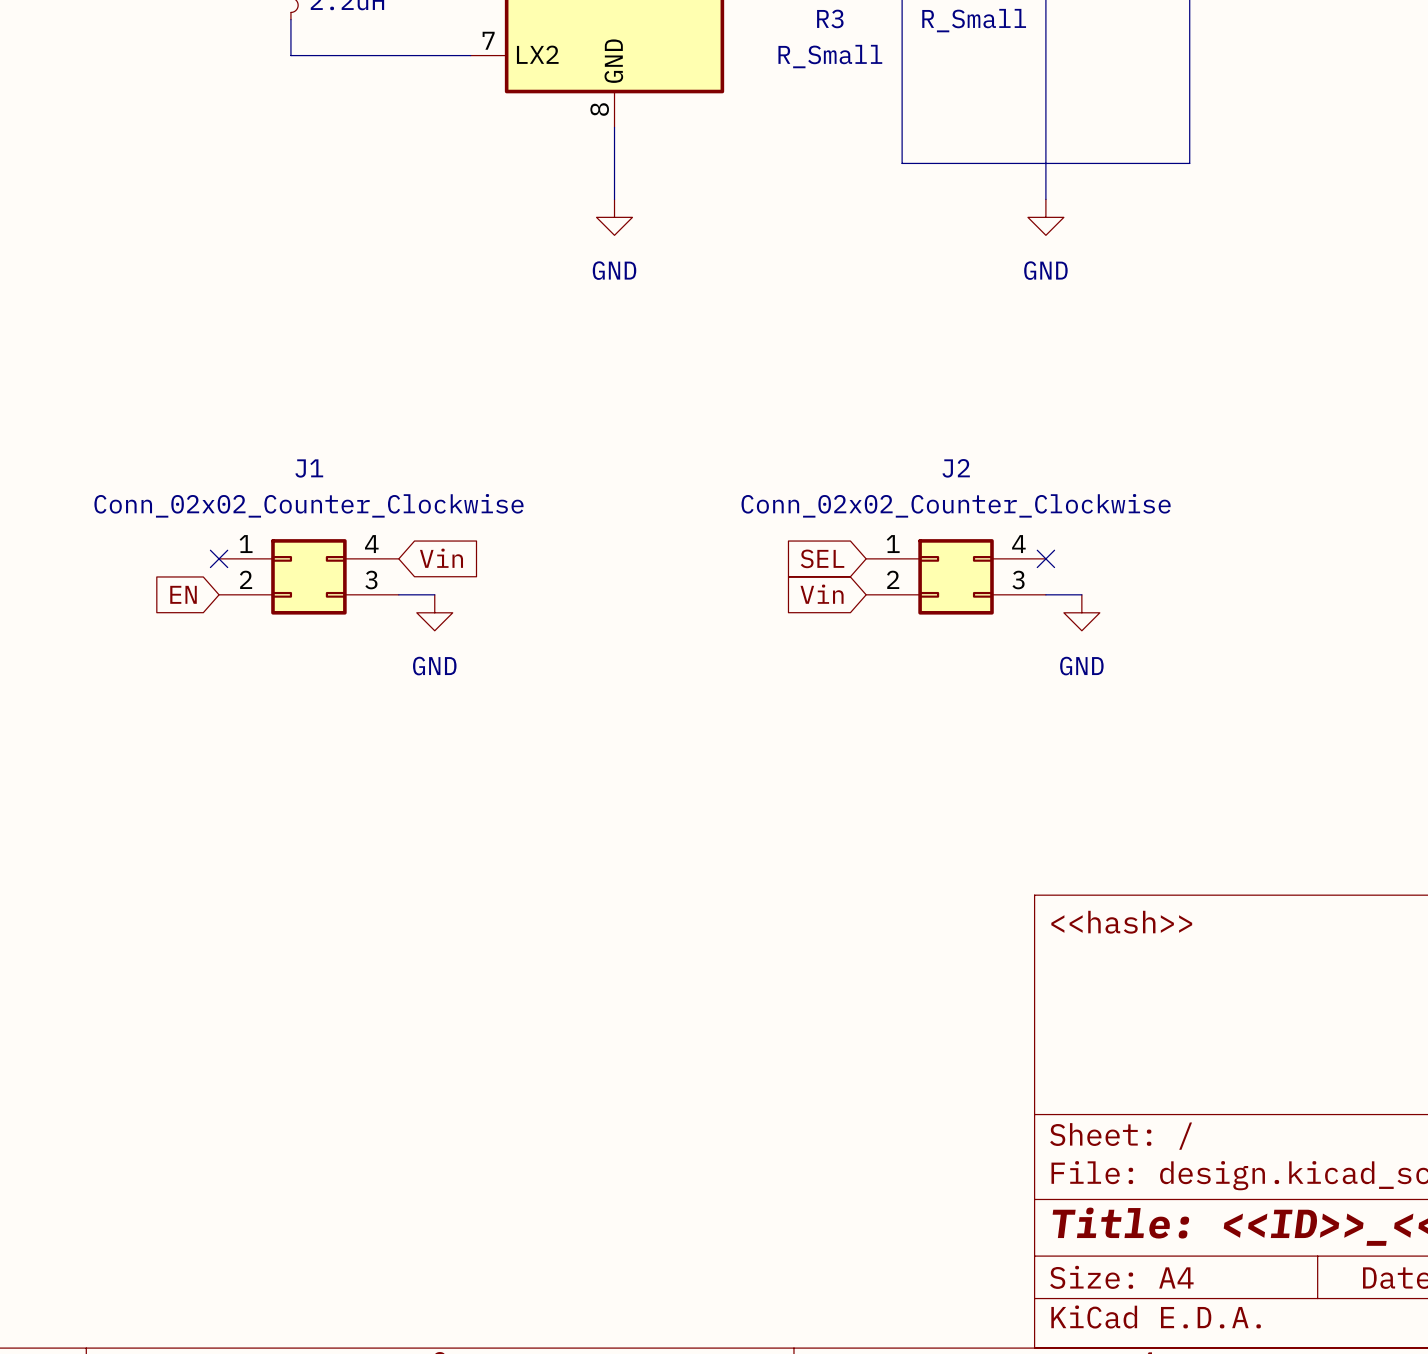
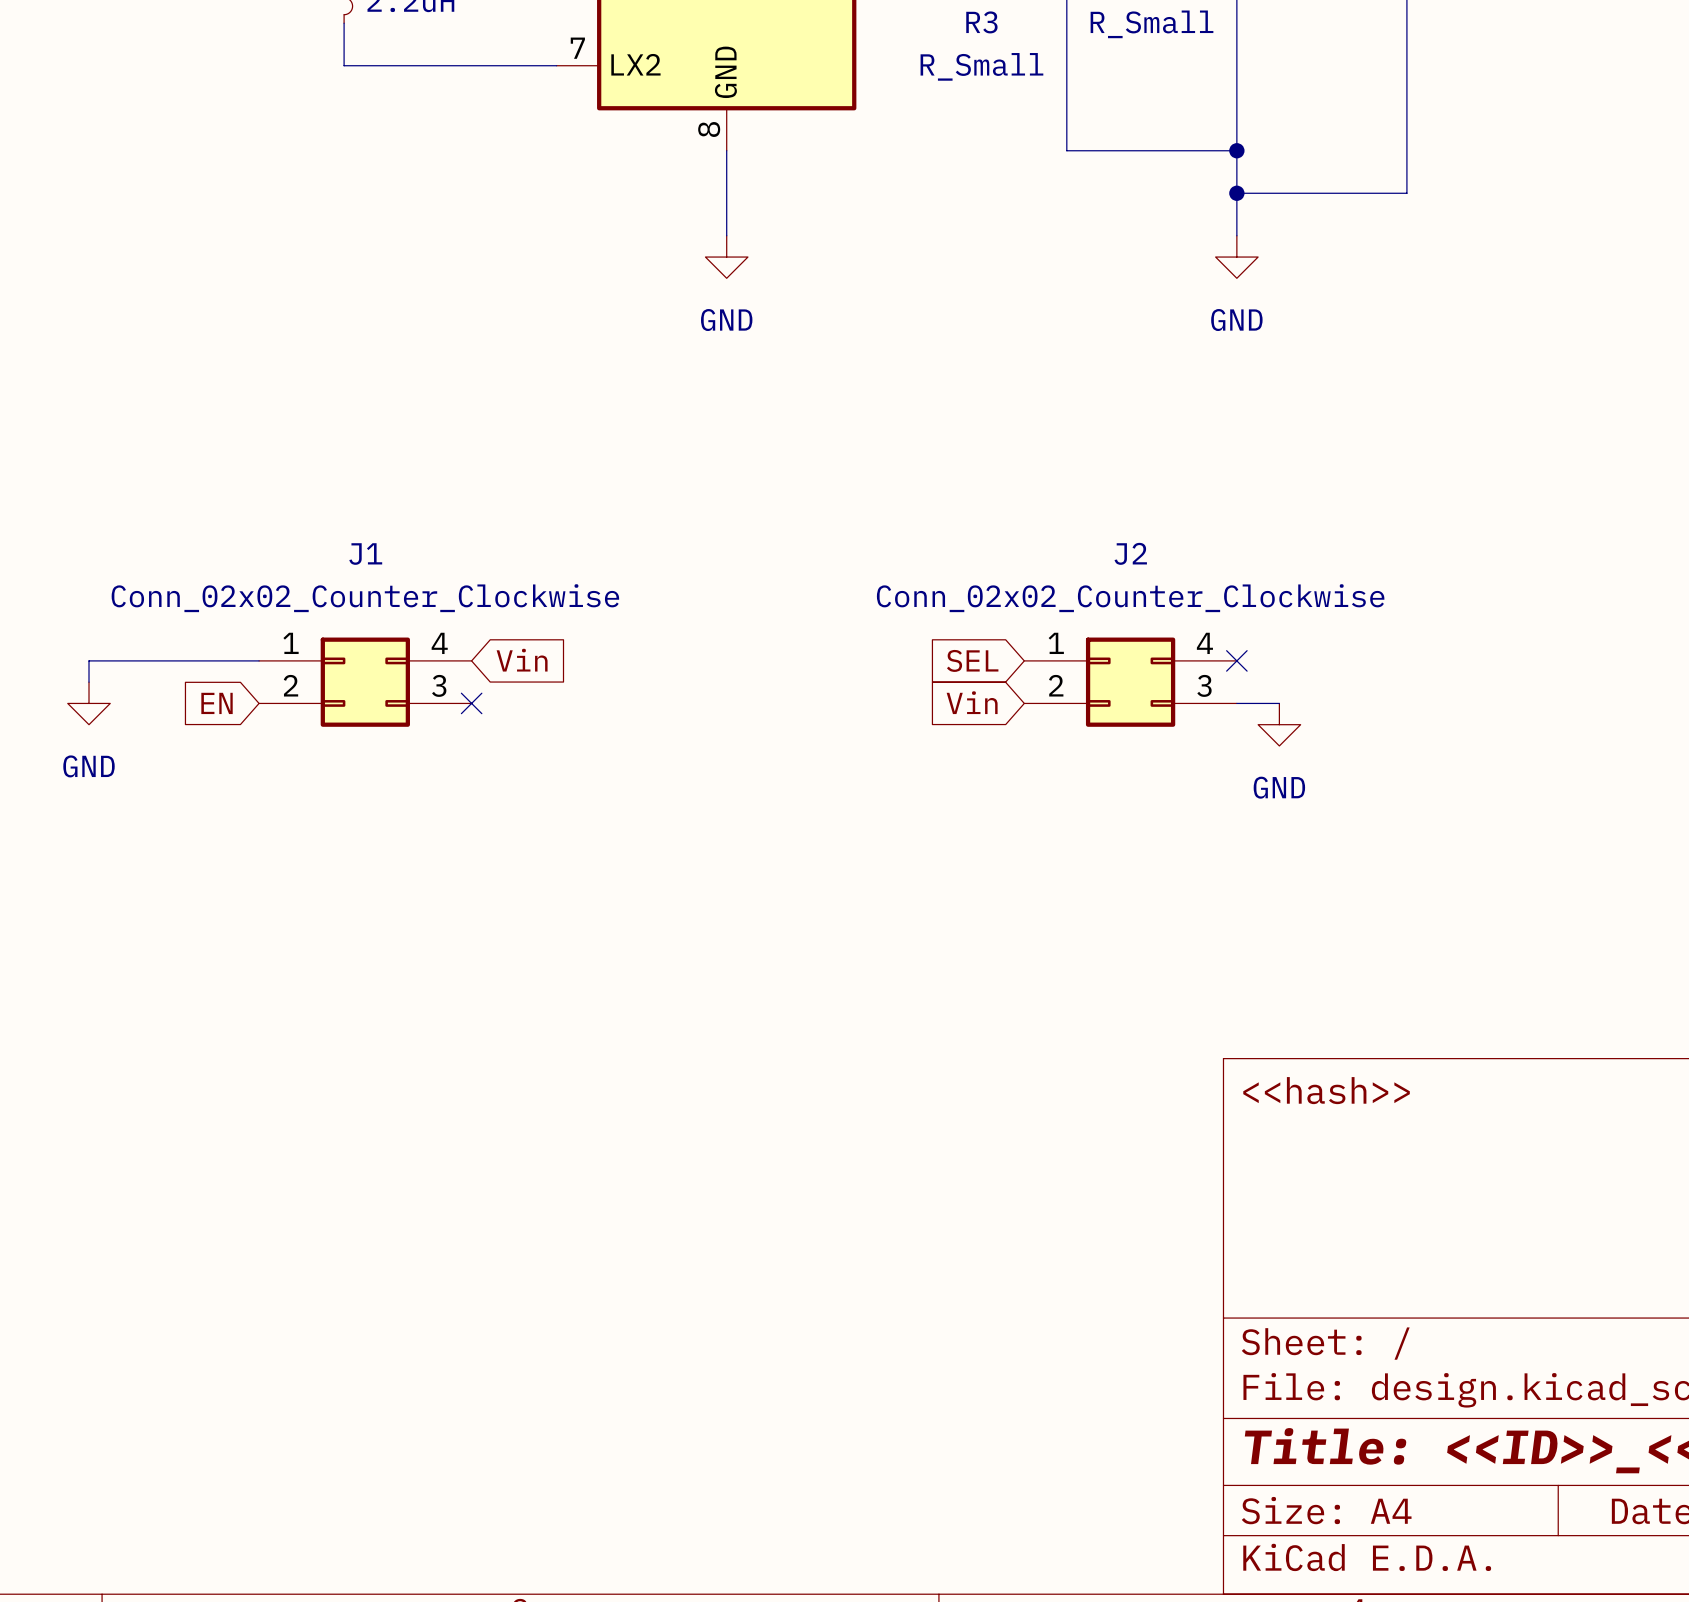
wire: (902, 127) (902, 163) (1045, 163) -> (1066, 150) (1236, 150)
junction: none -> (1236, 150)
junction: none -> (1236, 193)
wire: none -> (259, 660) (89, 660) (89, 682)
no-connect mark: (219, 558) -> none
power symbol: none -> GND (89, 703)
wire: (398, 594) (434, 594) -> none
no-connect mark: none -> (471, 703)
power symbol: GND (434, 612) -> none

